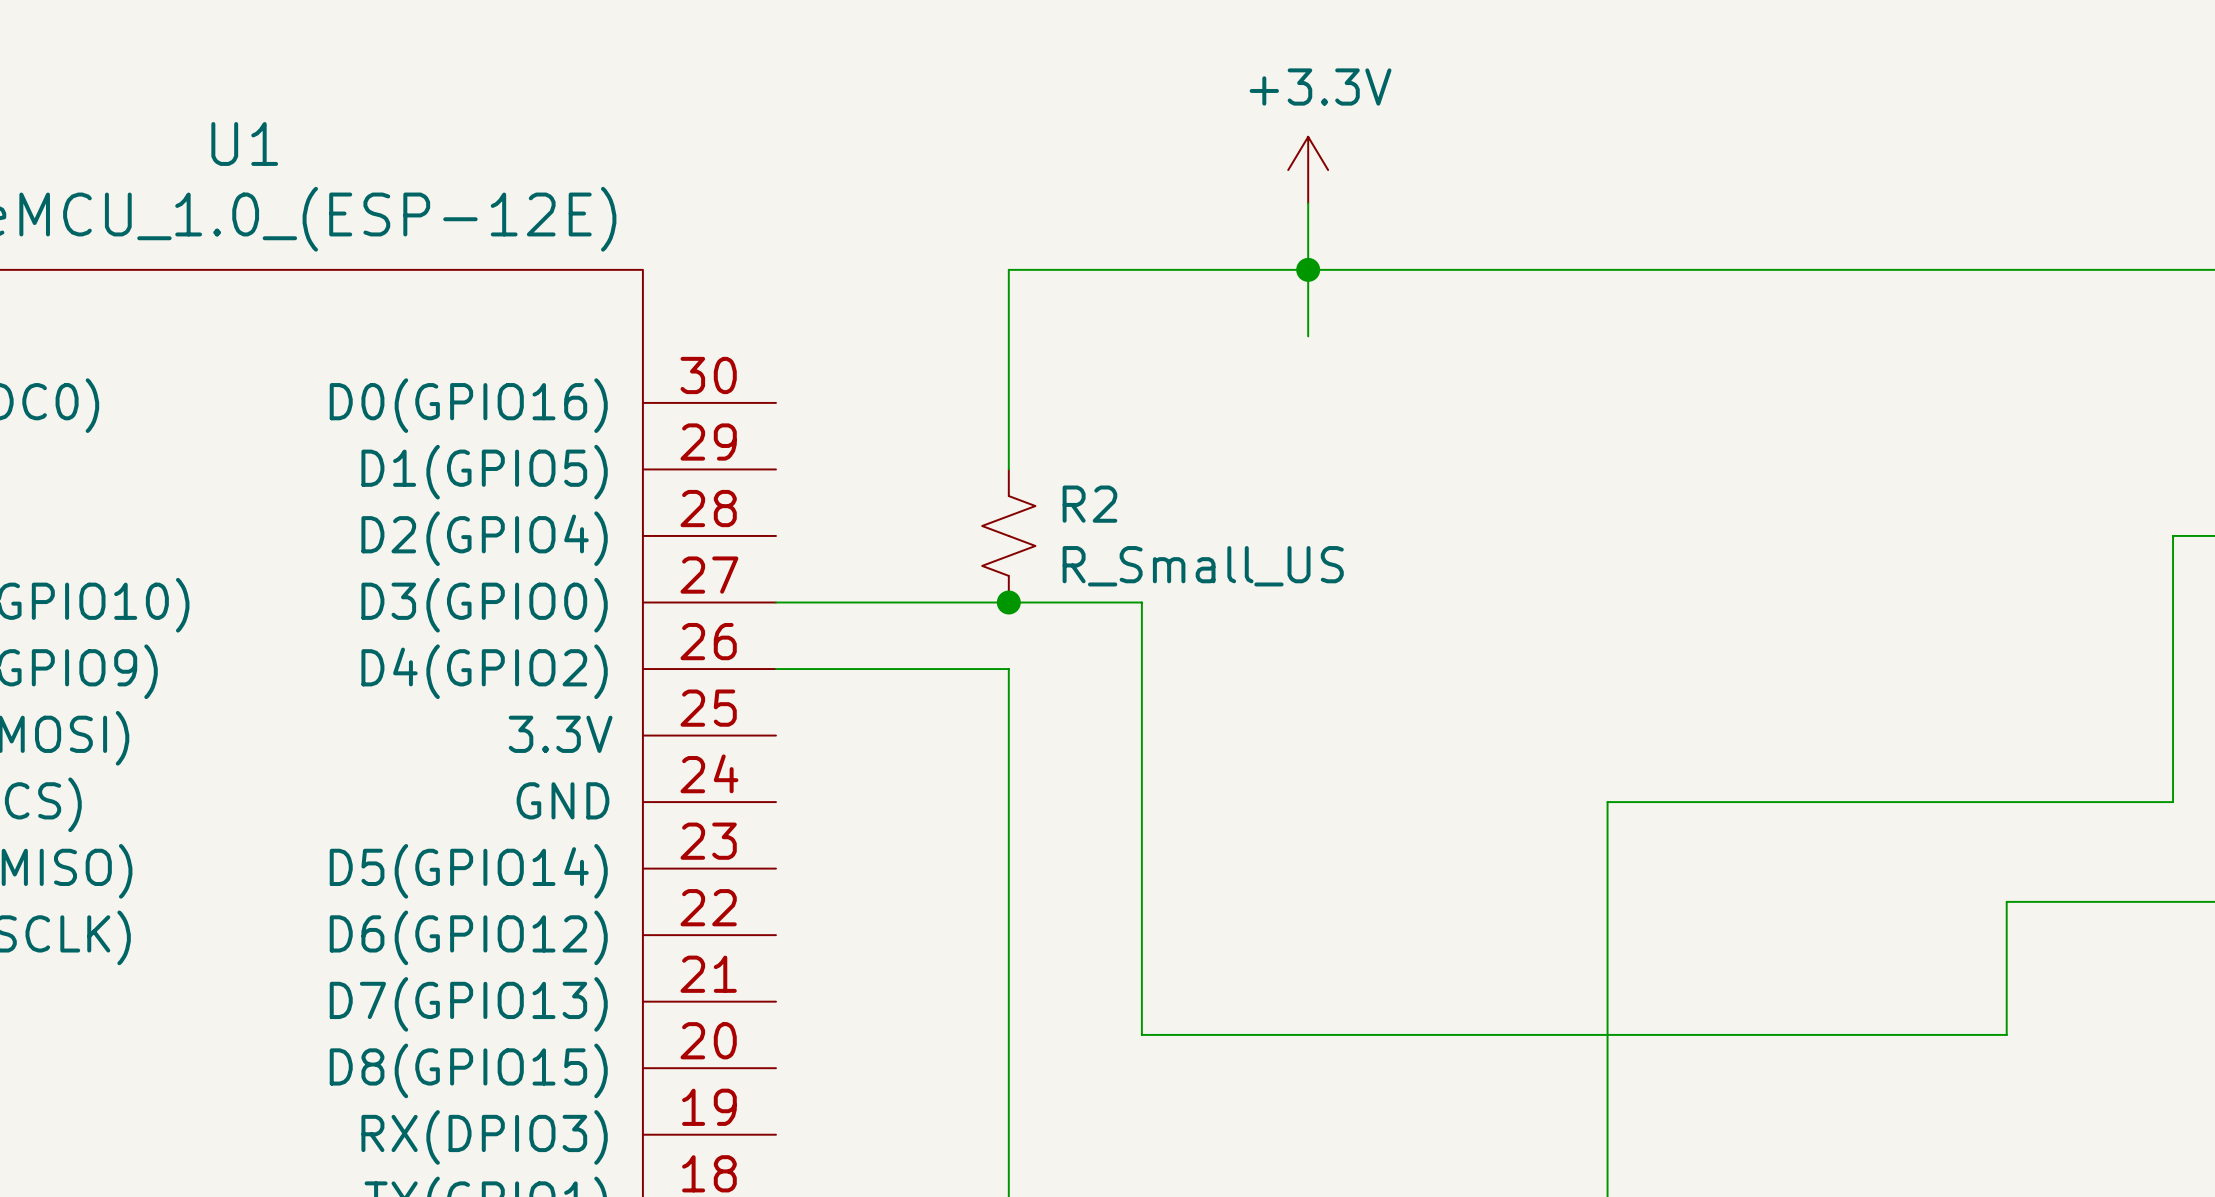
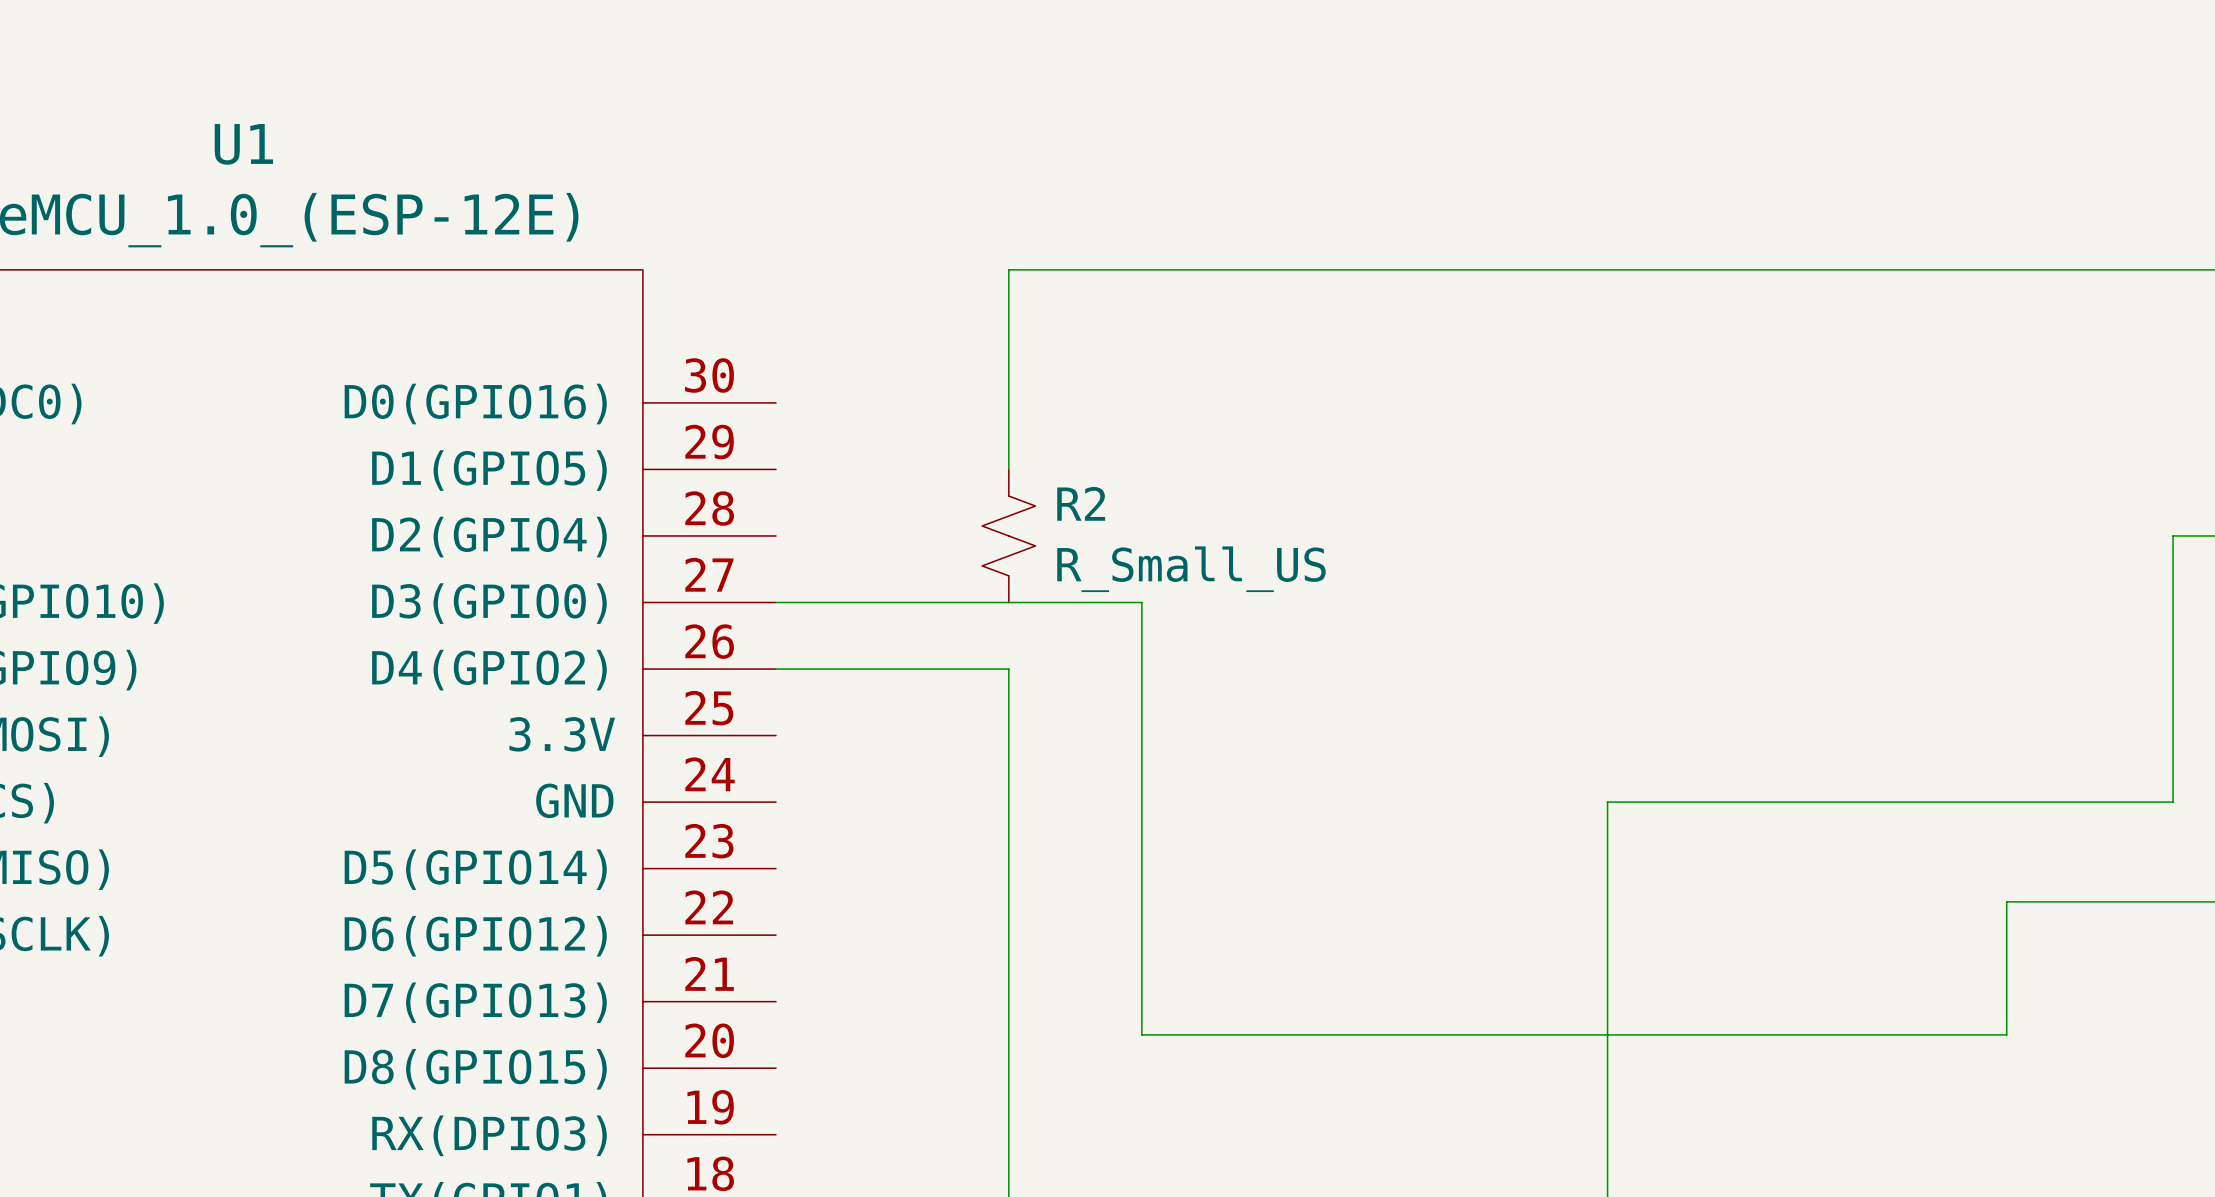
power symbol: +3.3V (1308, 170) -> none
wire: (1308, 203) (1308, 336) -> none
junction: (1308, 269) -> none
junction: (1008, 602) -> none

